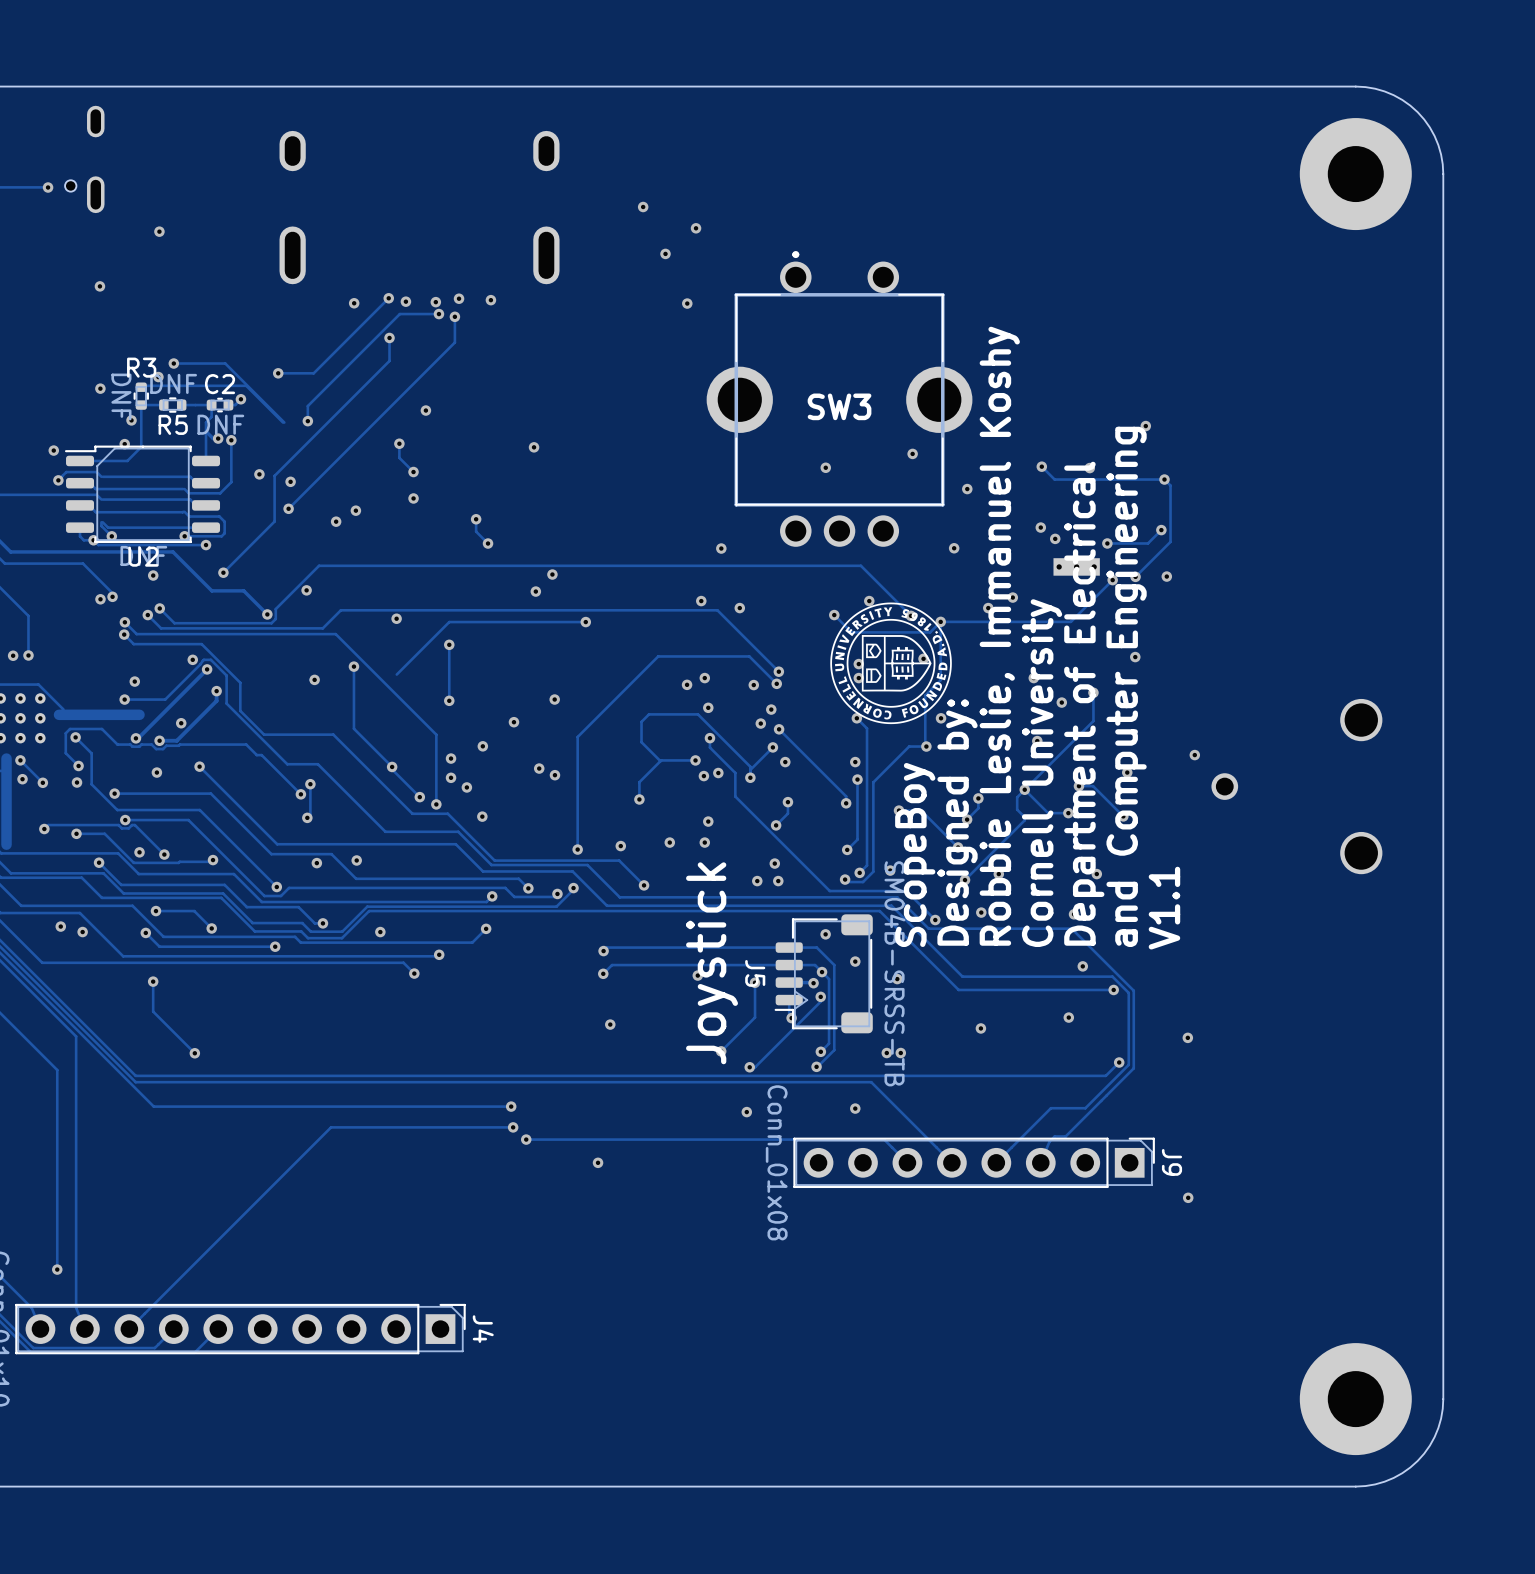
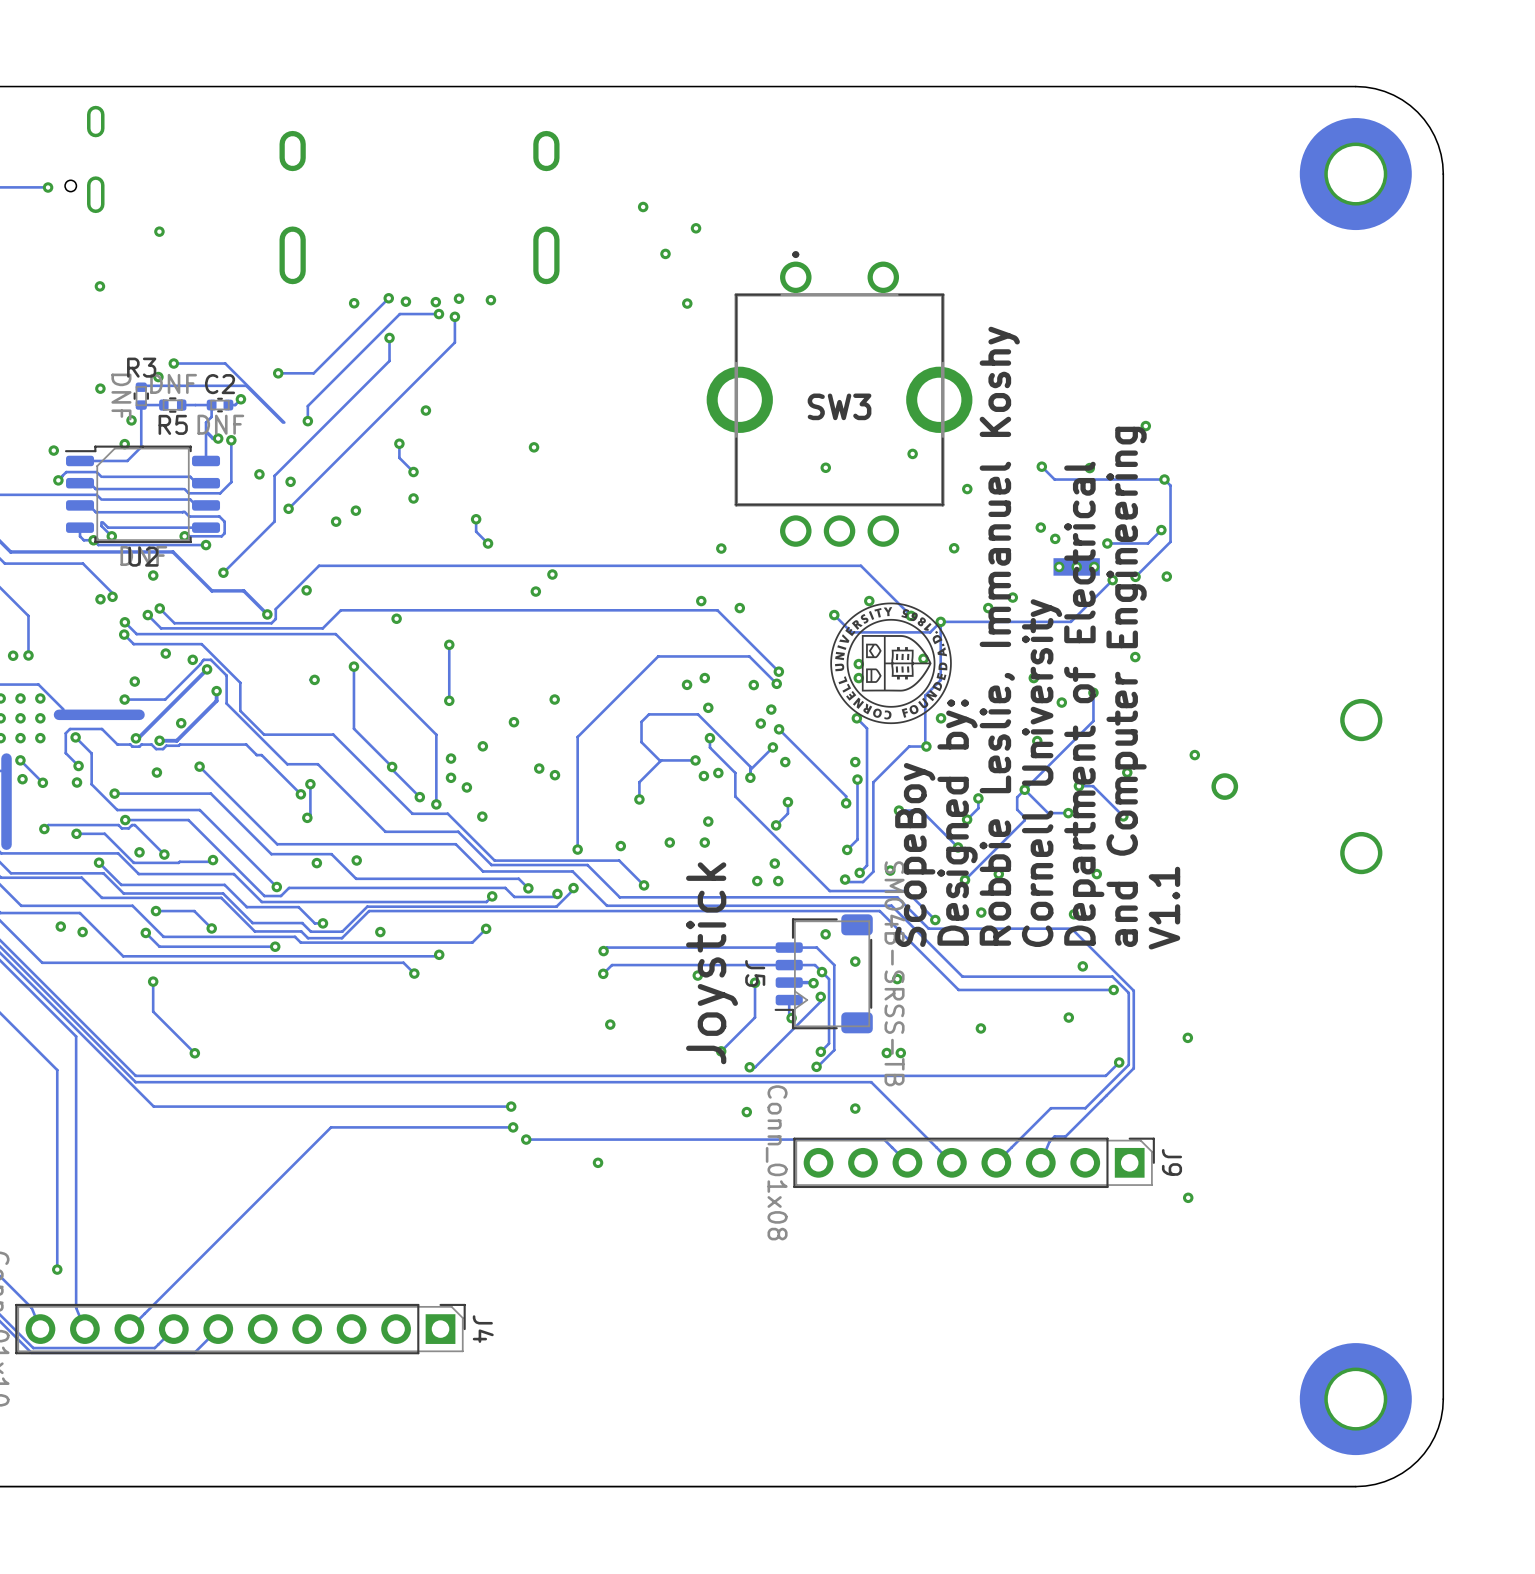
track: (585, 622) (449, 622) (396, 674) -> none
via: (585, 622) -> none
via: none -> (165, 653)

